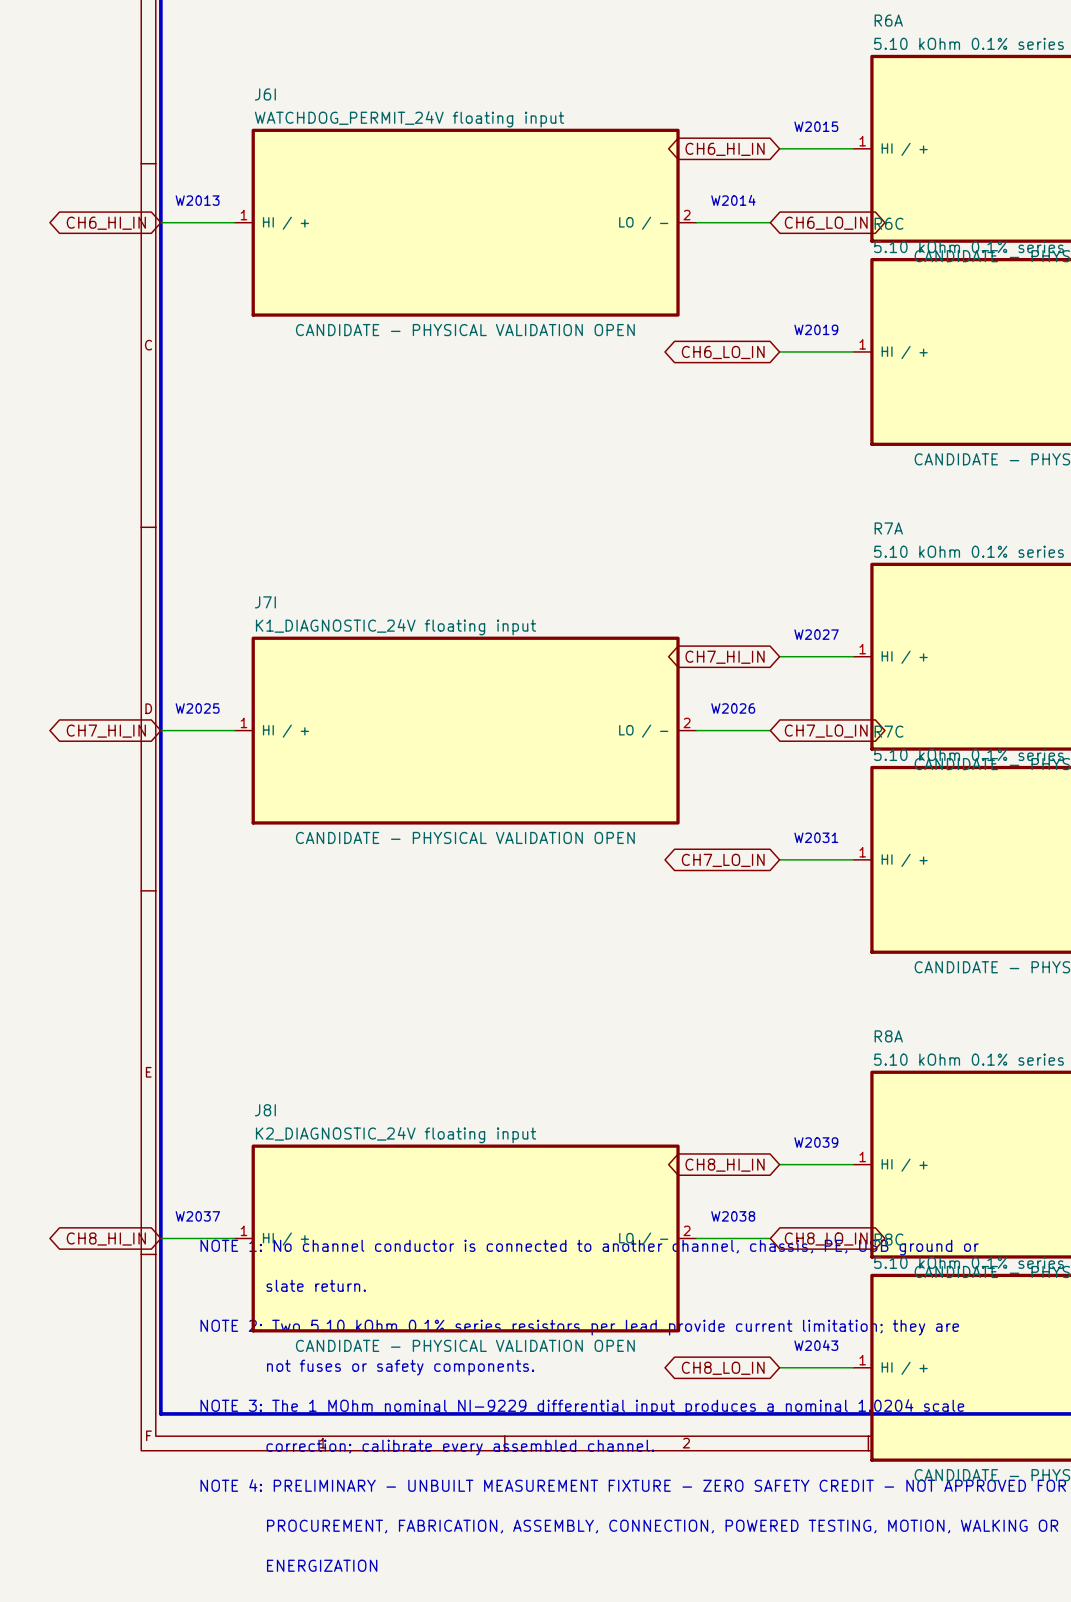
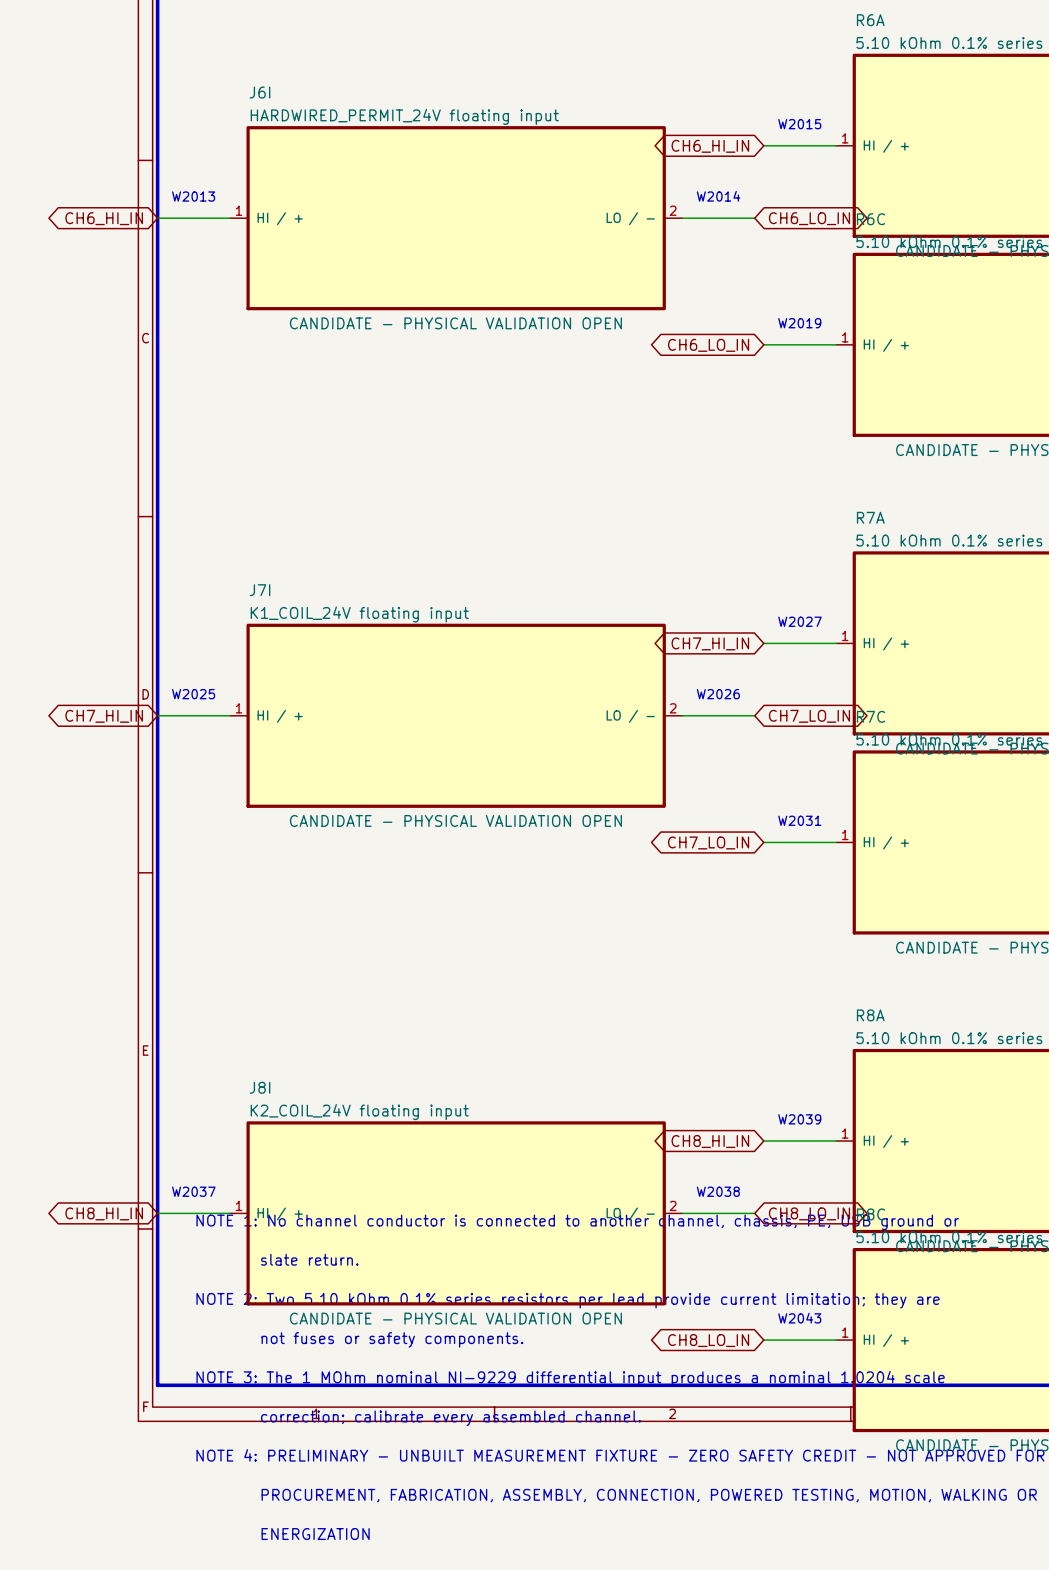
J6I text: WATCHDOG_PERMIT_24V floating input (409, 119) -> HARDWIRED_PERMIT_24V floating input (404, 116)
J7I text: K1_DIAGNOSTIC_24V floating input (396, 627) -> K1_COIL_24V floating input (359, 614)
J8I text: K2_DIAGNOSTIC_24V floating input (396, 1135) -> K2_COIL_24V floating input (359, 1112)

